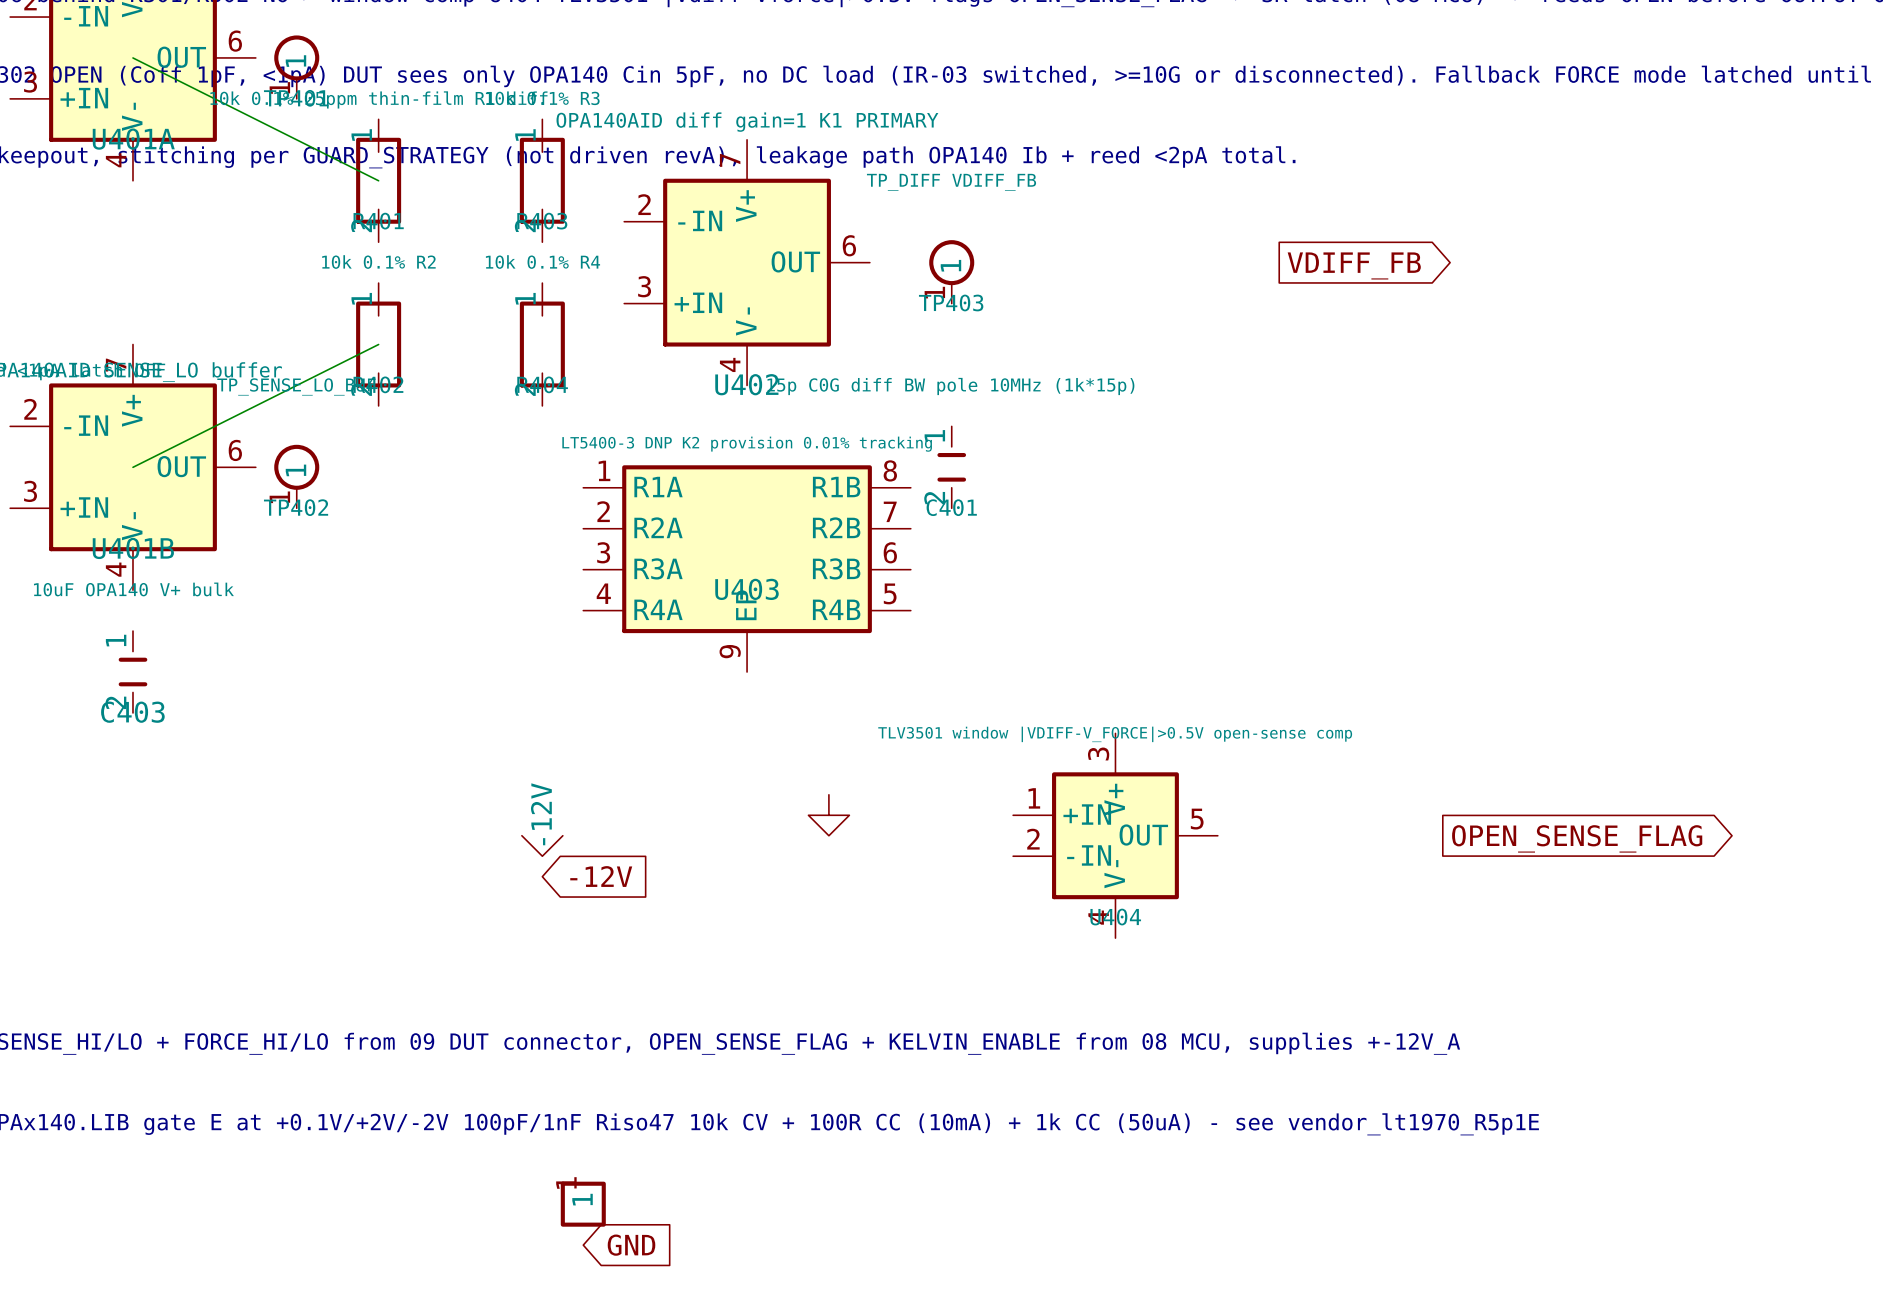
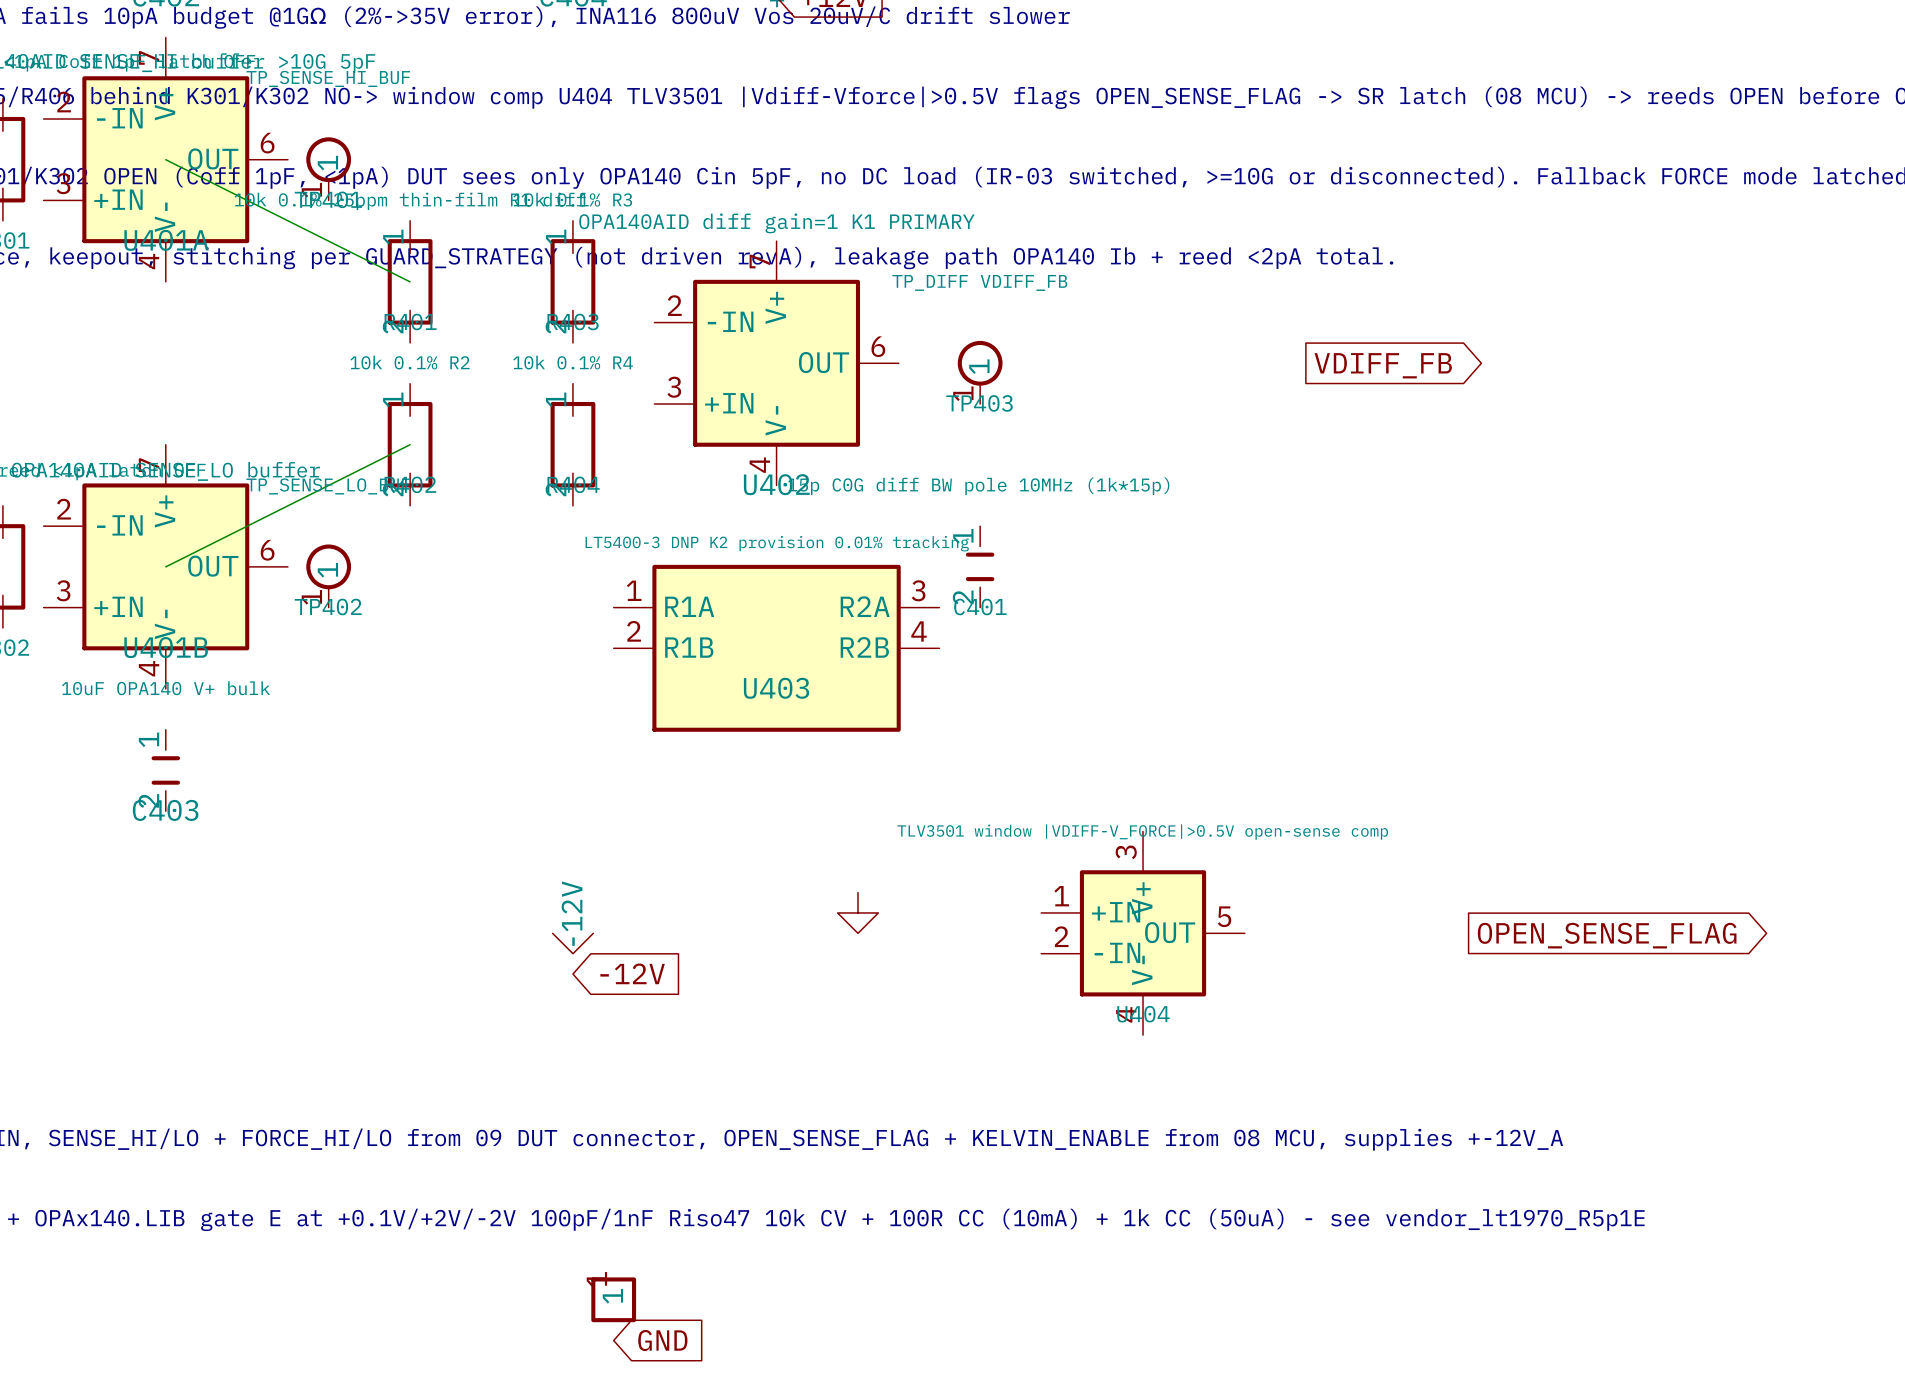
U403 symbol: [583, 465, 911, 673] -> [613, 564, 940, 732]

